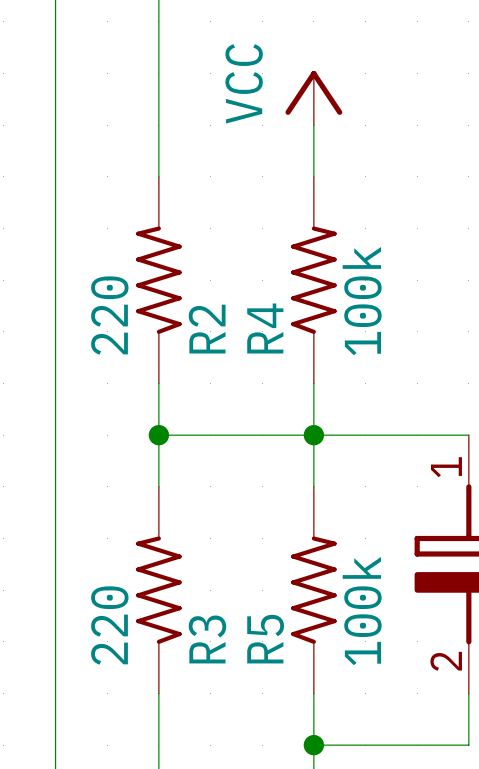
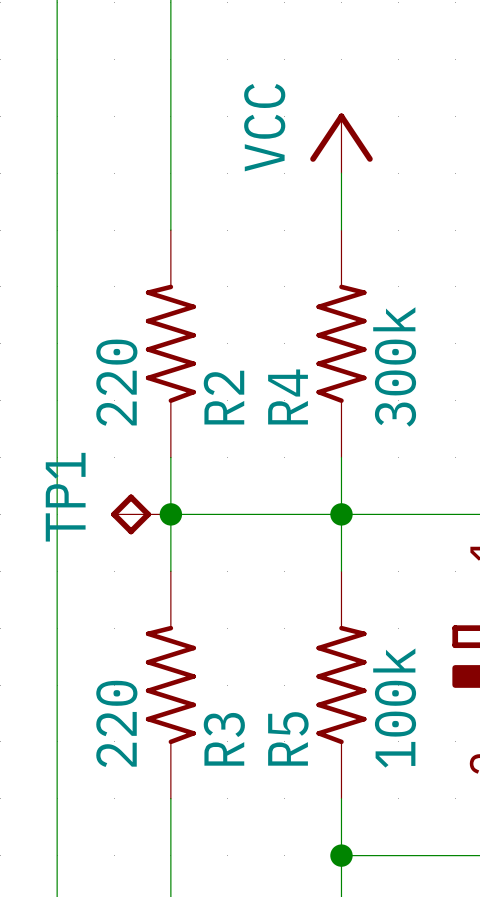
R4 value: 100k (362, 301) -> 300k (394, 366)
TP1: none -> (141, 514)

